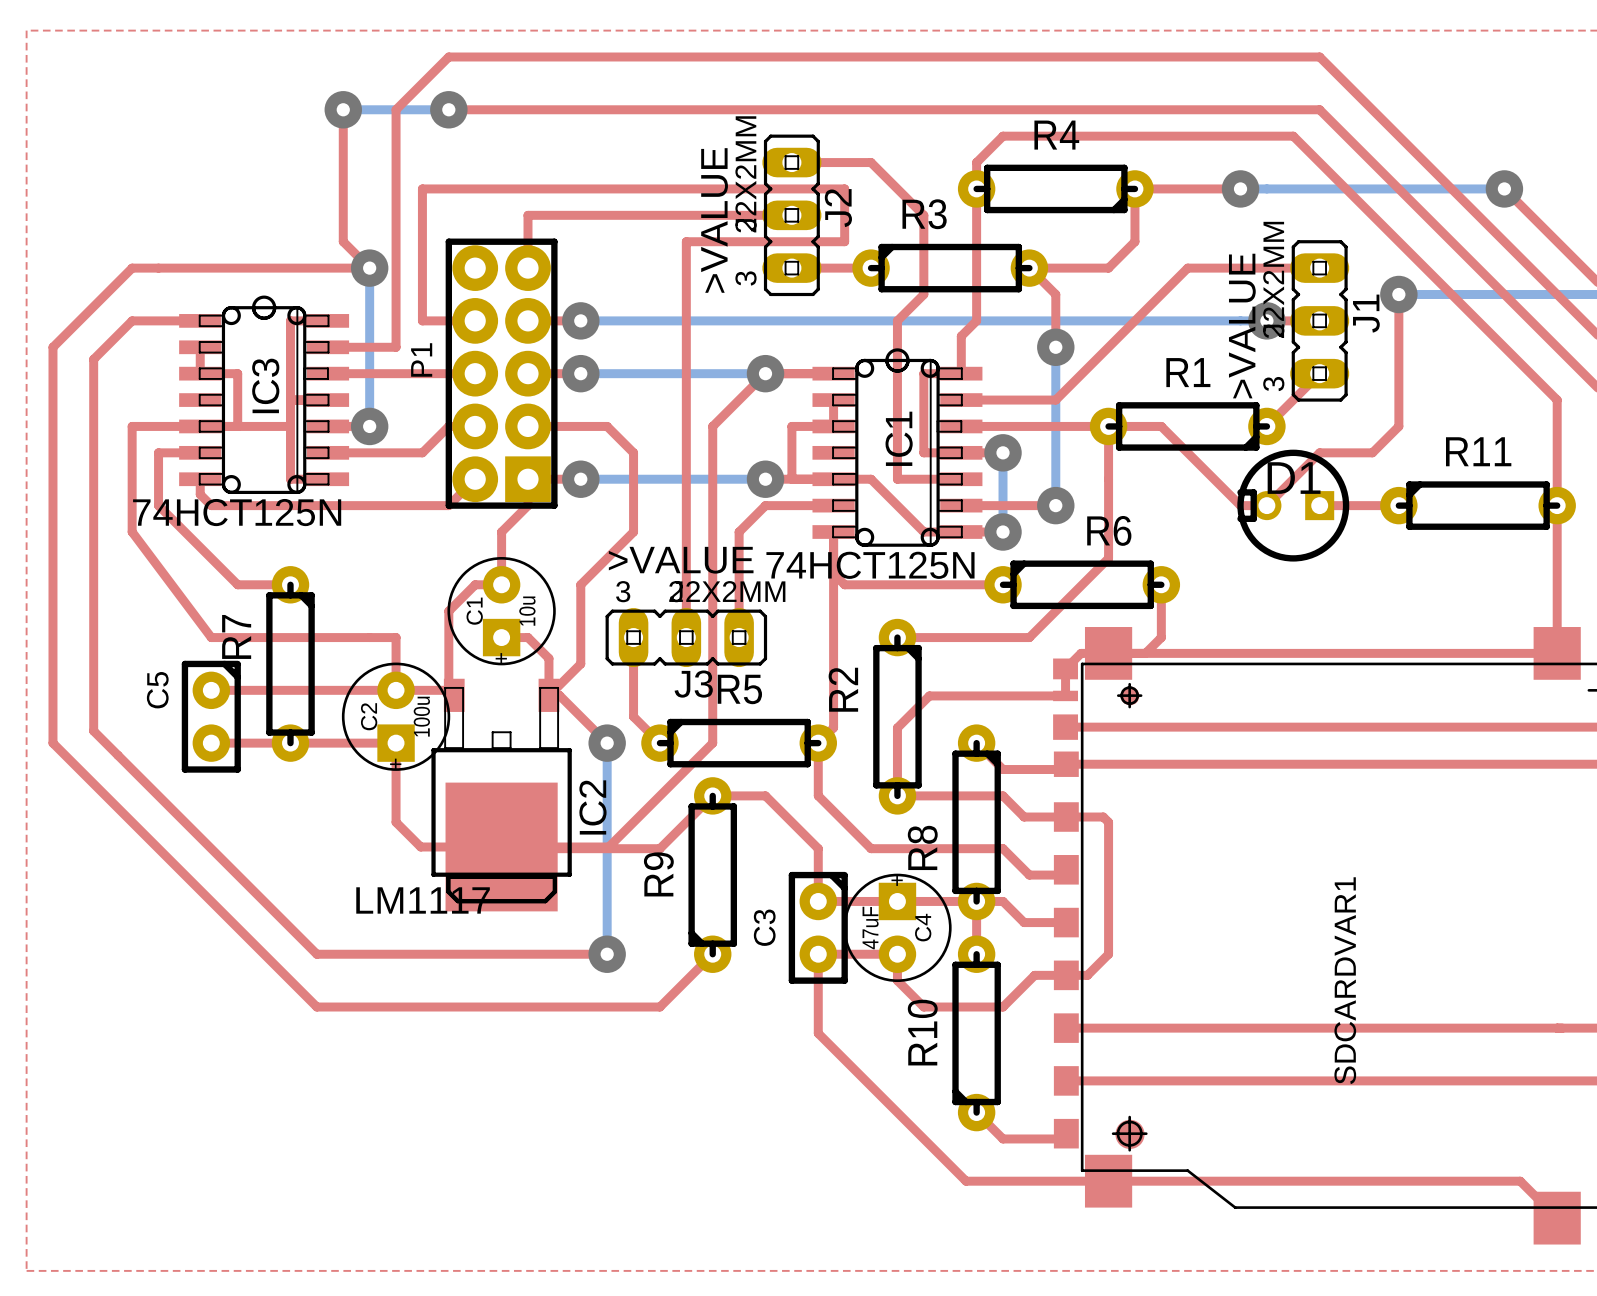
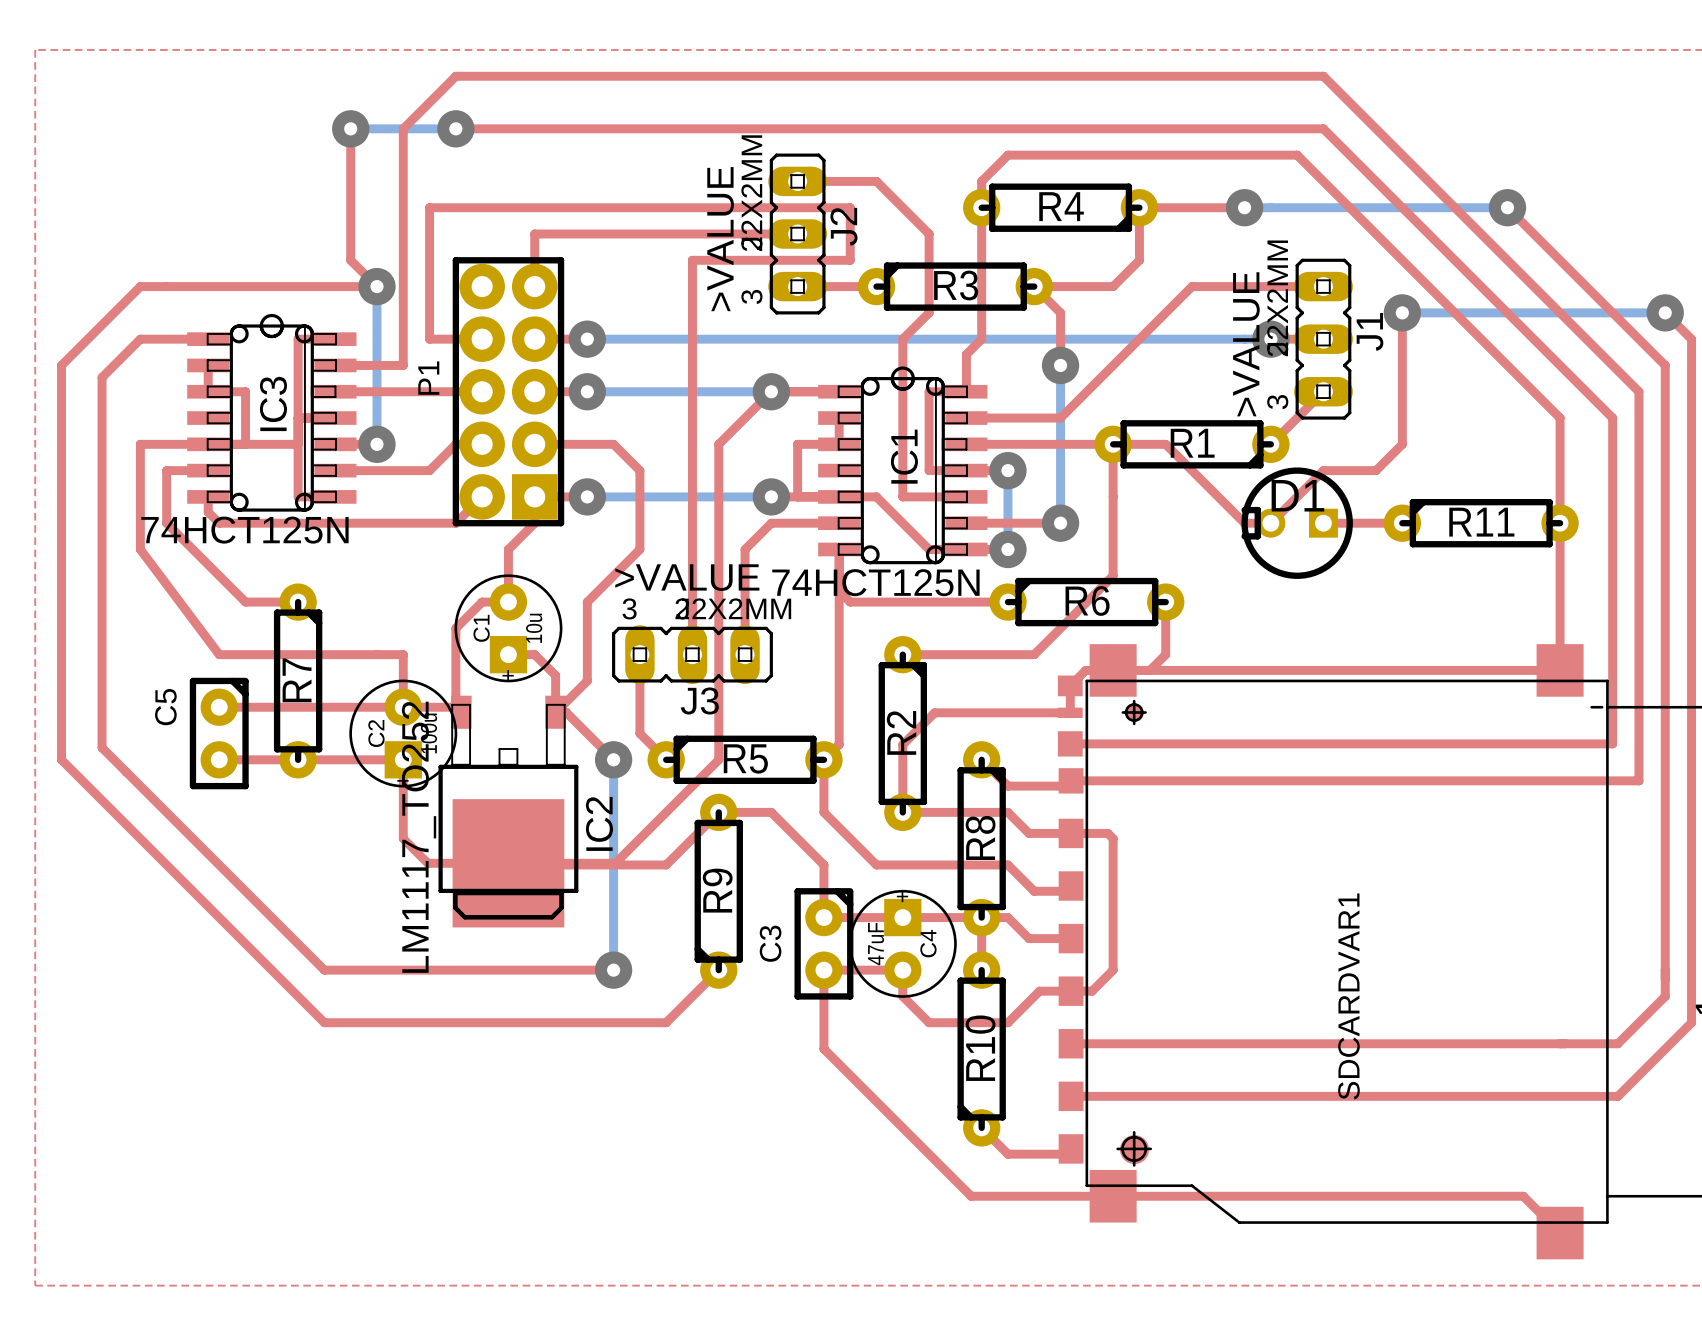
R4 name position: R4 (1056, 135) -> R4 (1061, 206)
R3 name position: R3 (924, 214) -> R3 (956, 285)
R1 name position: R1 (1188, 372) -> R1 (1192, 443)
R11 name position: R11 (1478, 451) -> R11 (1481, 522)
R6 name position: R6 (1109, 530) -> R6 (1087, 600)
R7 name position: R7 (236, 636) -> R7 (297, 680)
R5 name position: R5 (739, 689) -> R5 (745, 758)
R2 name position: R2 (843, 689) -> R2 (901, 732)
R8 name position: R8 (922, 847) -> R8 (980, 837)
R9 name position: R9 (658, 874) -> R9 (717, 890)
IC2 value: LM1117 (423, 900) -> LM1117_TO252 (419, 837)
R10 name position: R10 (922, 1032) -> R10 (980, 1048)

